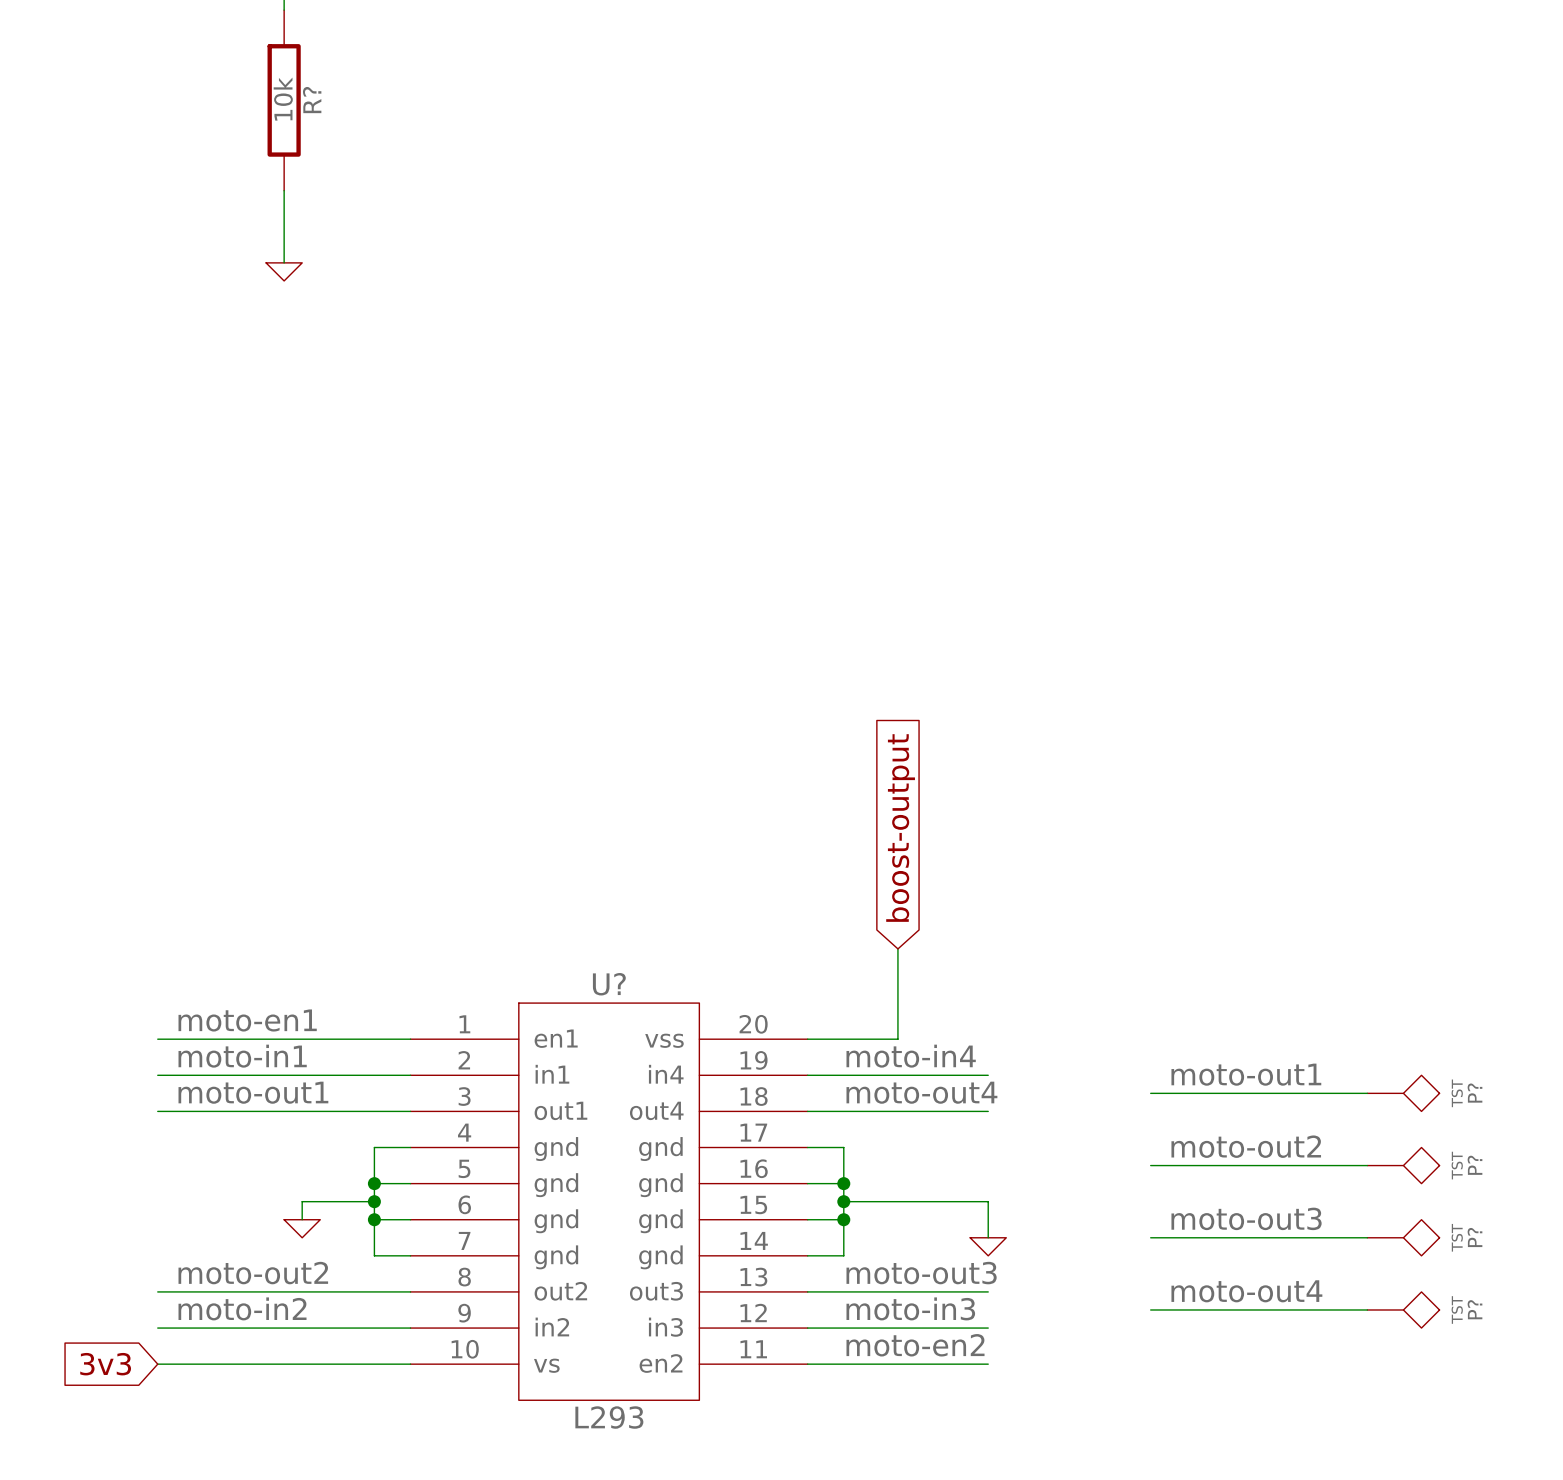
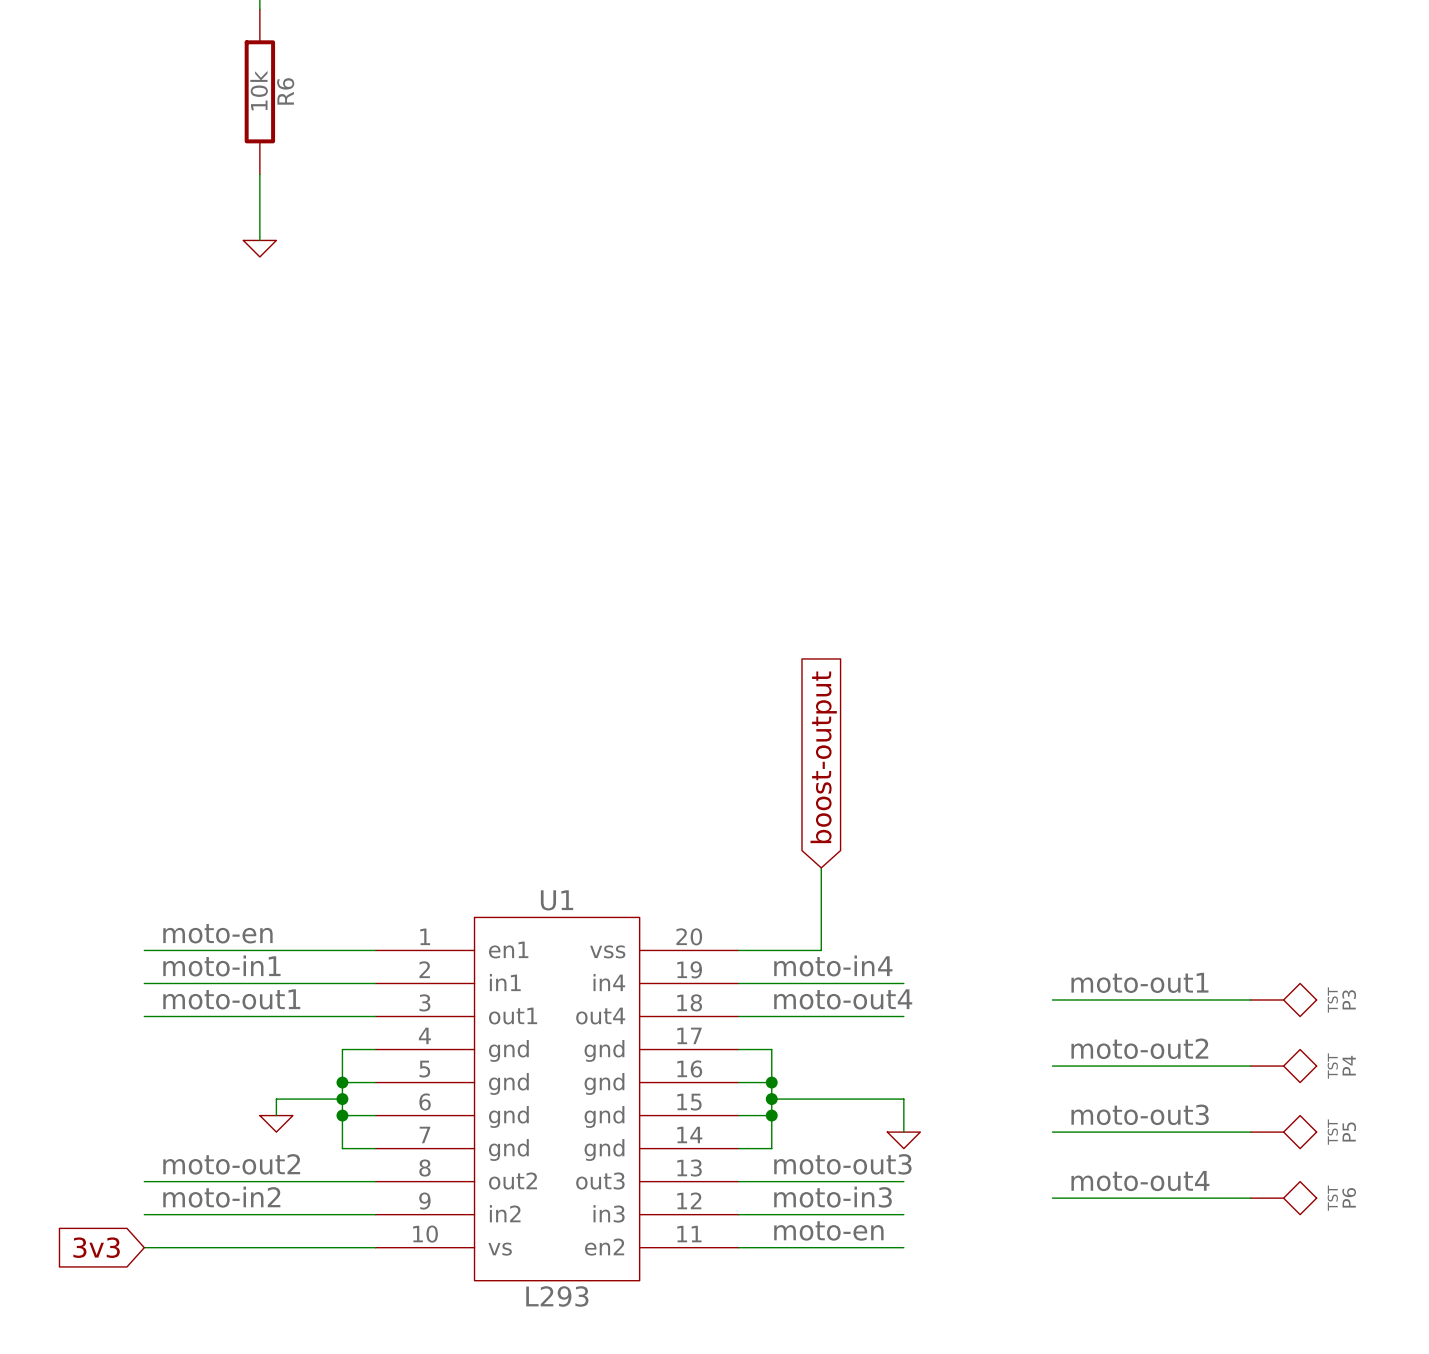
R? name: R? (312, 100) -> R6 (285, 91)
U? name: U? (609, 984) -> U1 (557, 900)
label: moto-en1 (247, 1020) -> moto-en (217, 933)
P? name: P? (1475, 1093) -> P3 (1349, 999)
P? name: P? (1475, 1165) -> P4 (1349, 1065)
P? name: P? (1475, 1237) -> P5 (1349, 1131)
P? name: P? (1475, 1309) -> P6 (1349, 1197)
label: moto-en2 (915, 1345) -> moto-en (828, 1230)

